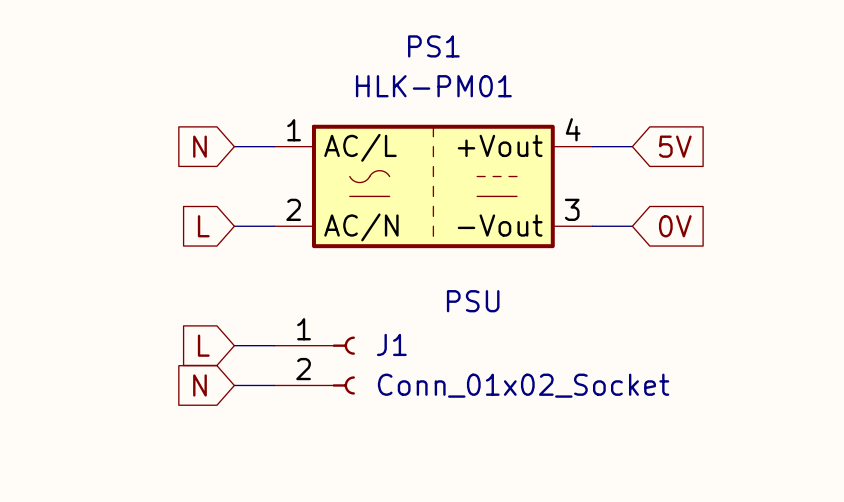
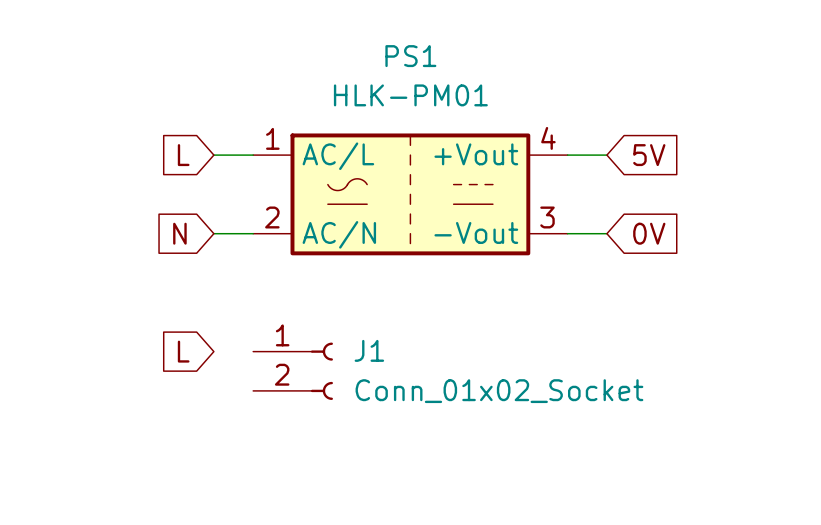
global label: N (199, 146) -> L (183, 155)
global label: L (203, 226) -> N (179, 233)
text: PSU (473, 301) -> none
wire: (234, 345) (274, 345) -> none
global label: N (199, 385) -> none
wire: (234, 385) (274, 385) -> none

